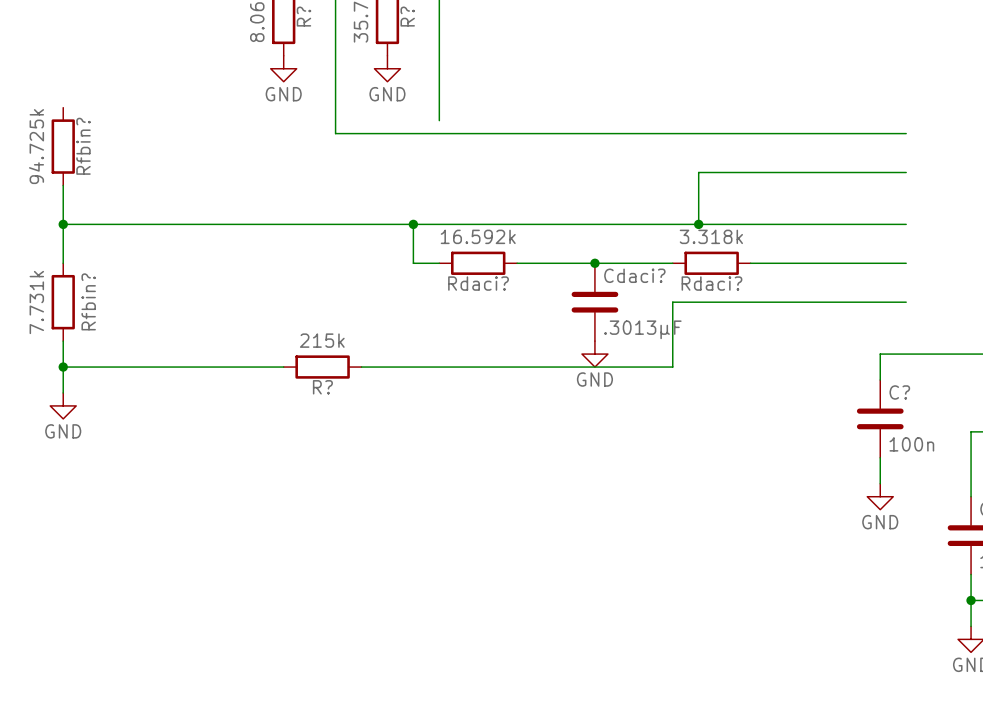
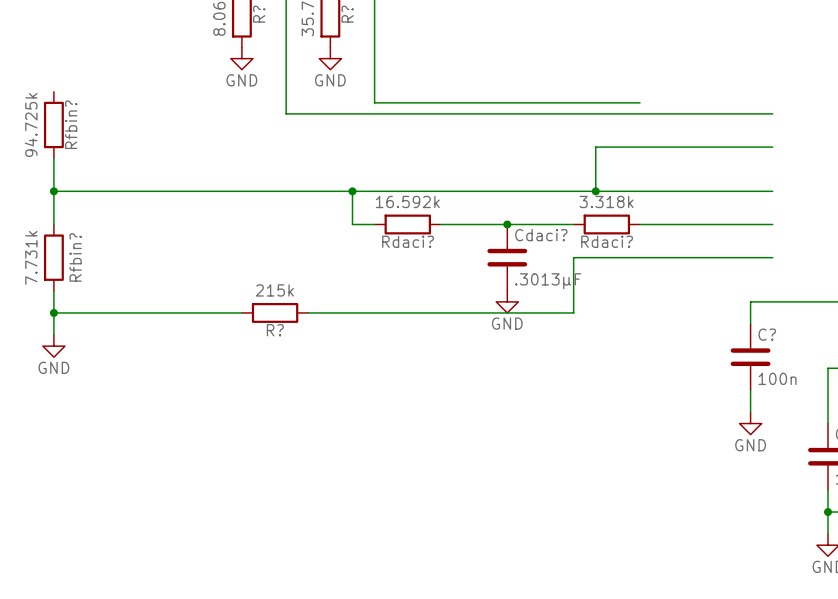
wire: none -> (374, 102) (640, 102)

